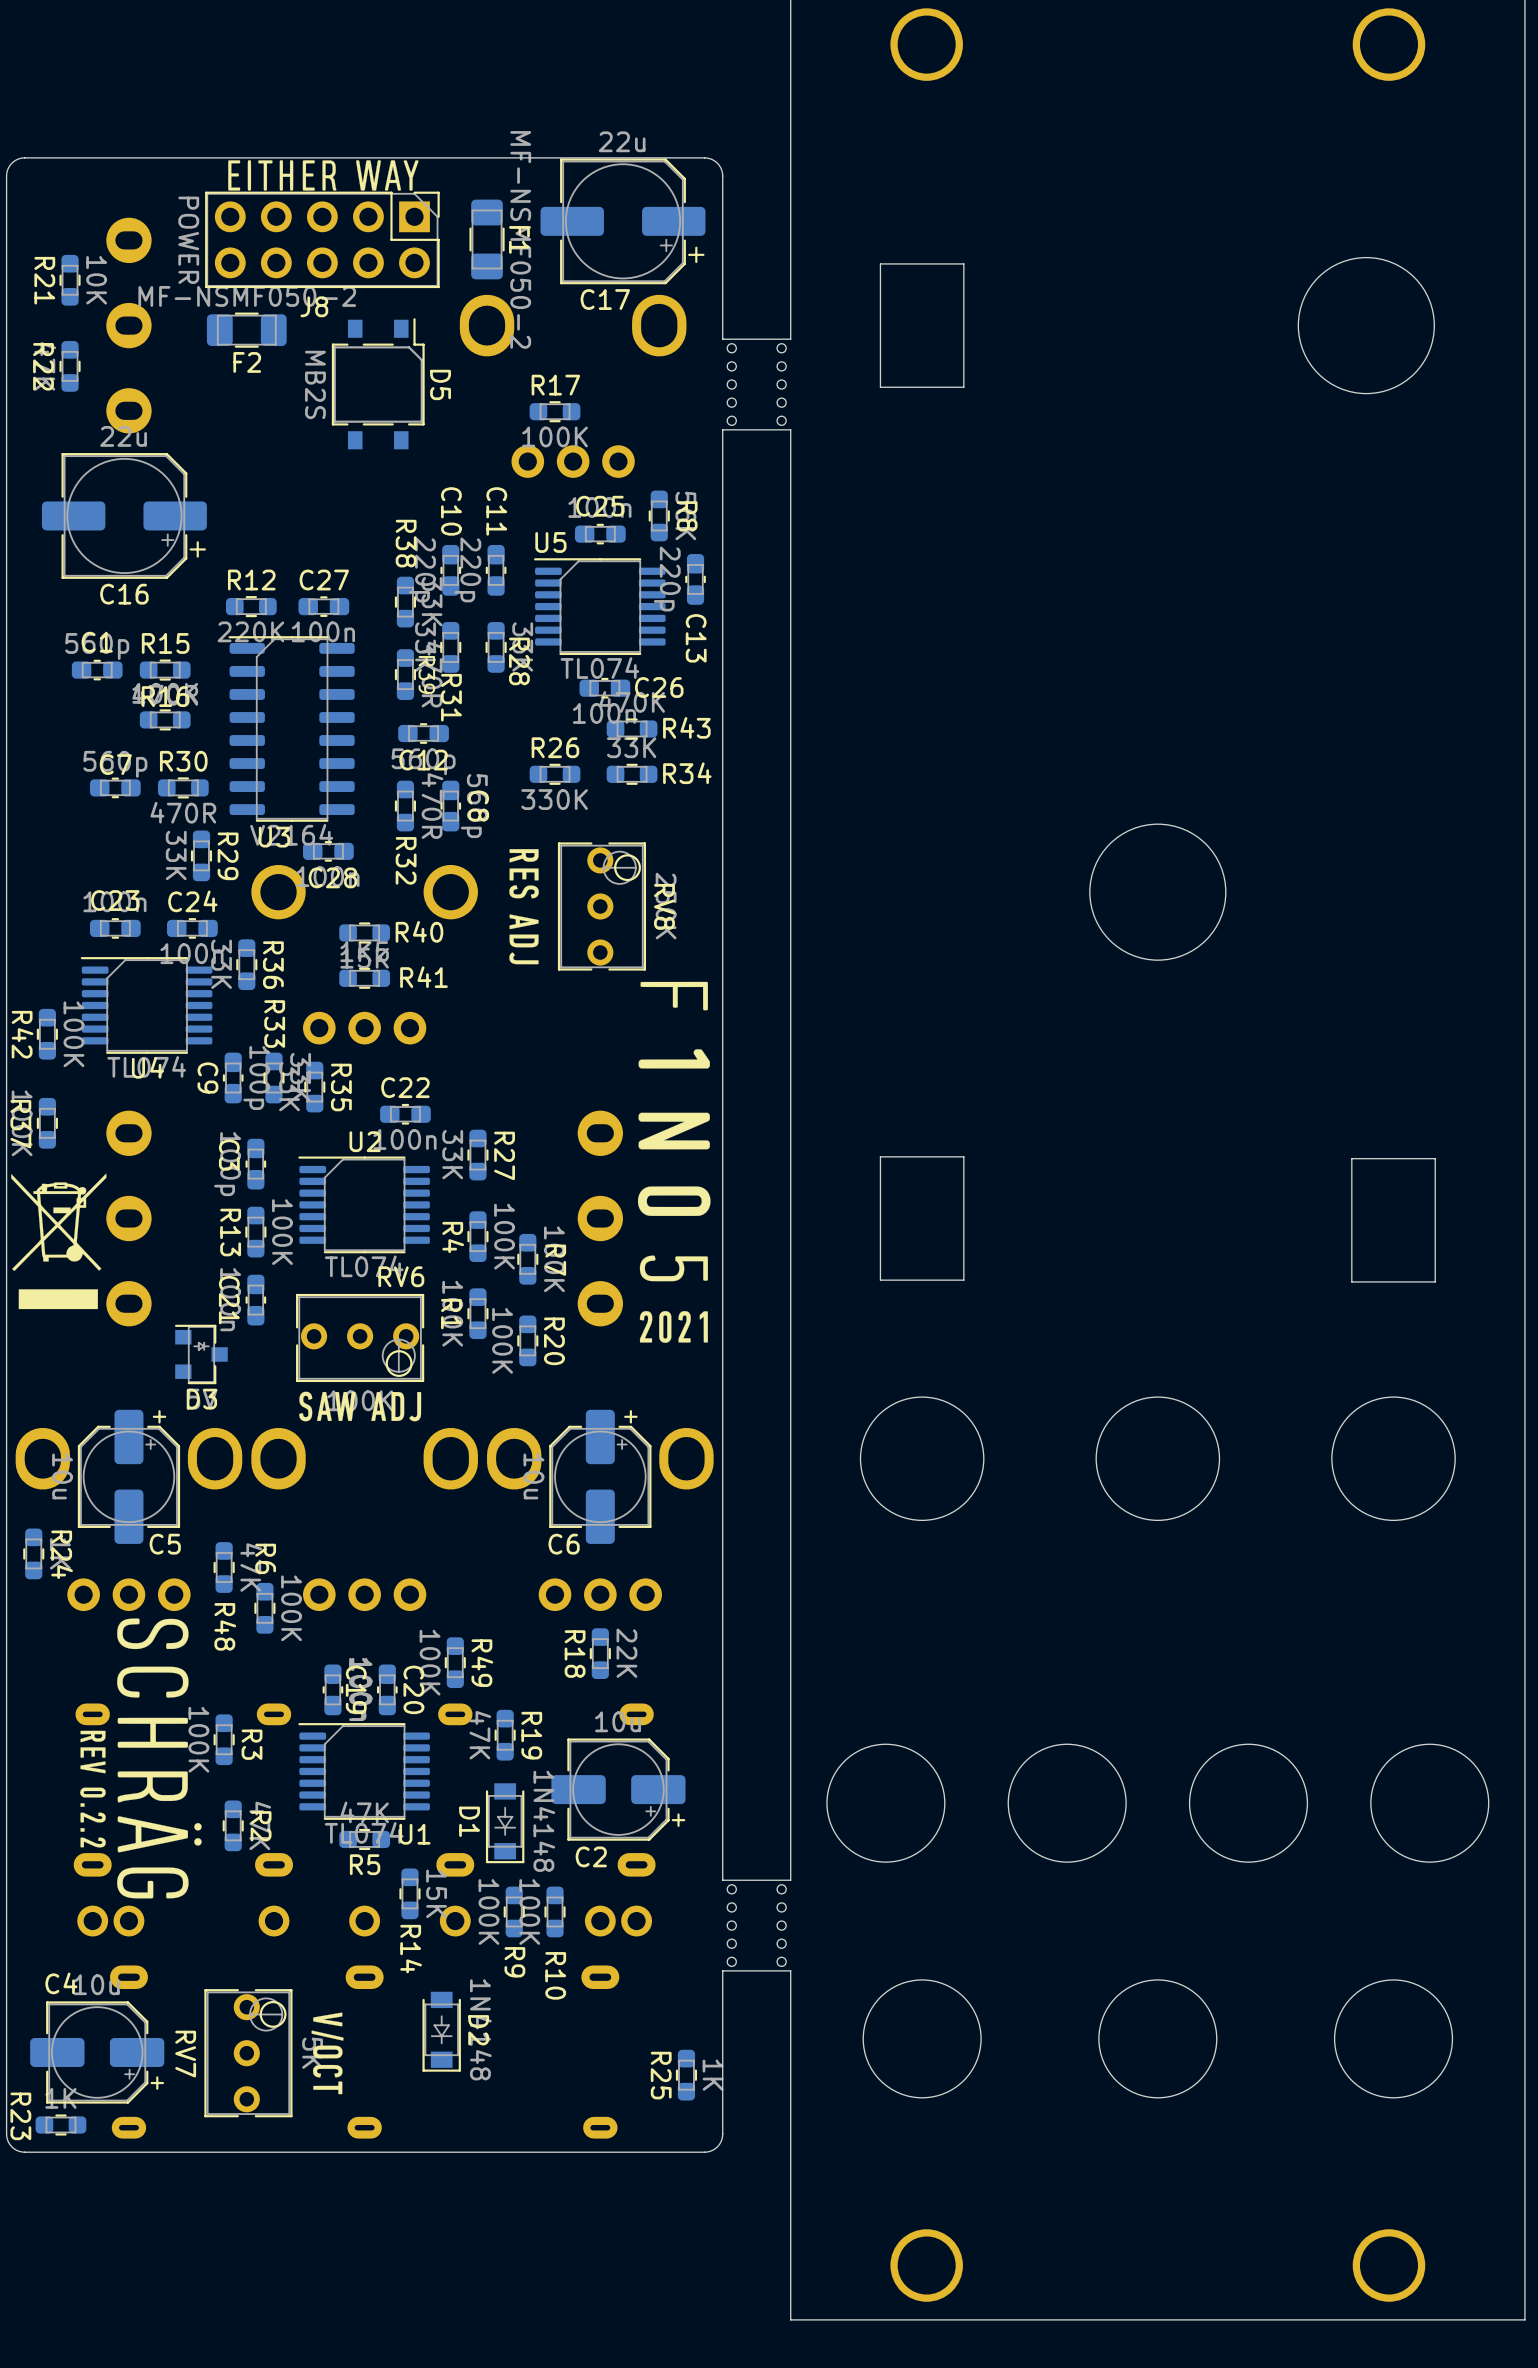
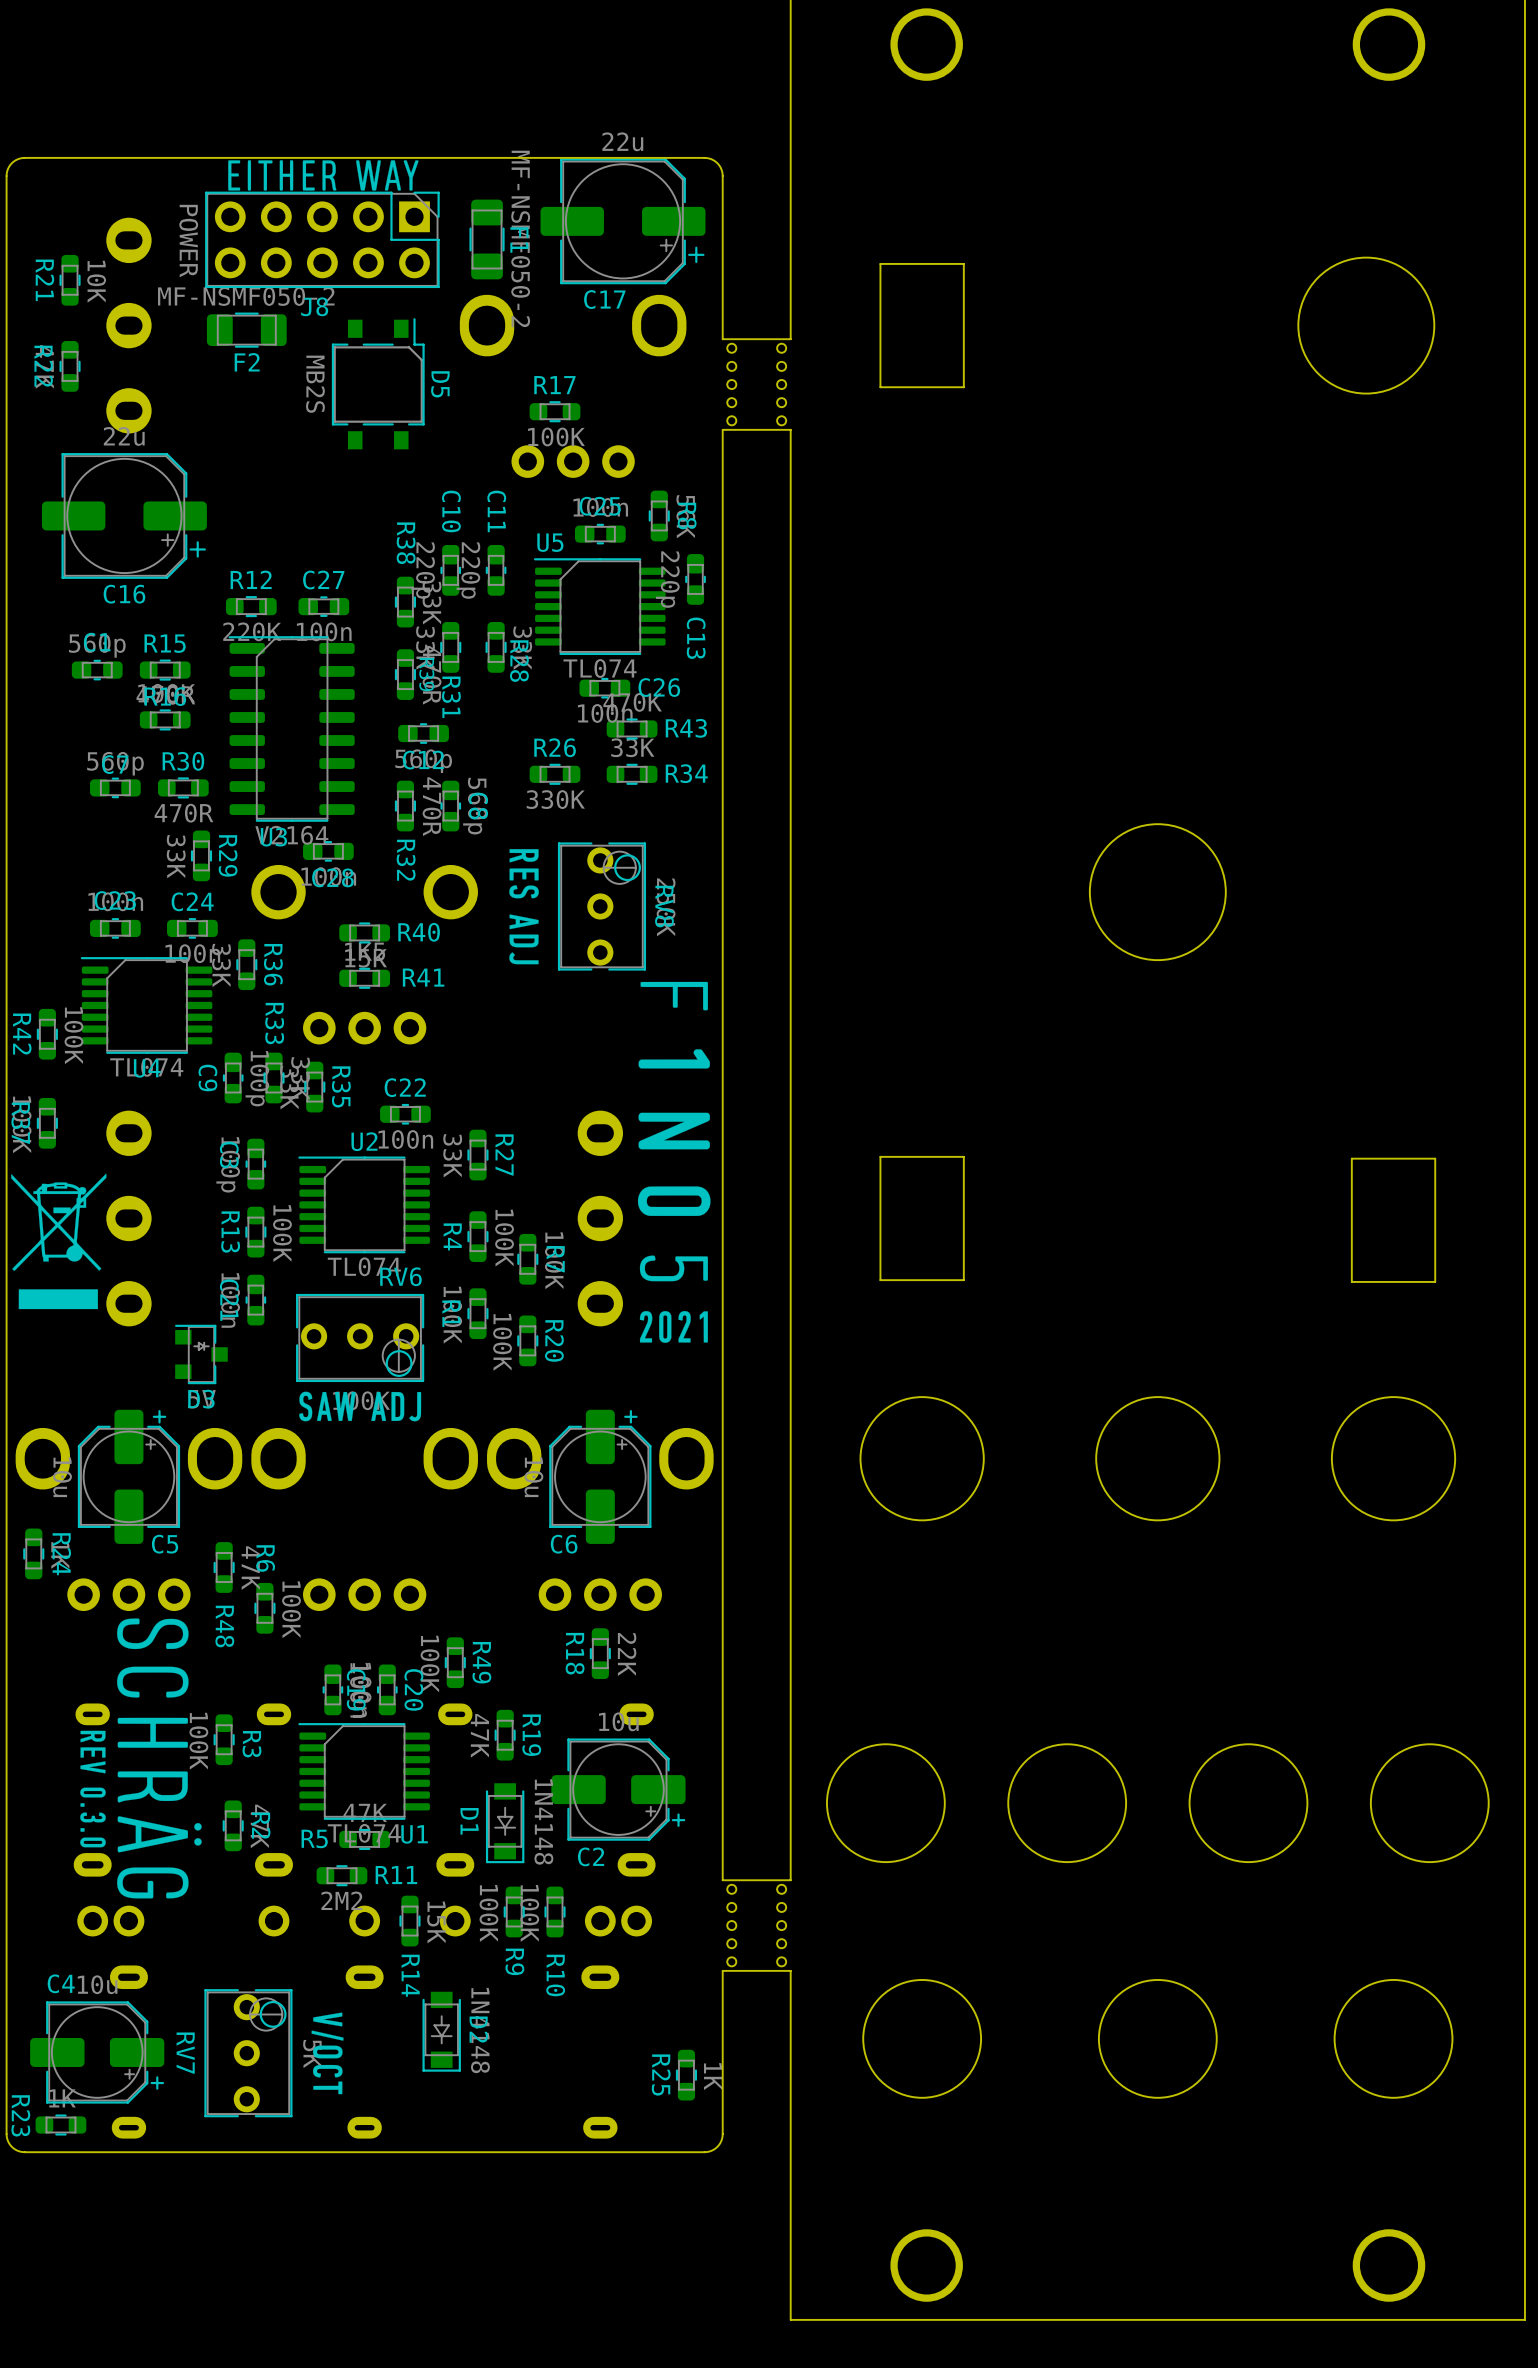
drawing shape: [11, 160, 711, 2095] -> [11, 160, 711, 2095]
R5 name position: R5 (365, 1864) -> R5 (314, 1838)
R11: none -> 2M2 (341, 1875)
R14 position: (409, 1893) -> (409, 1921)

